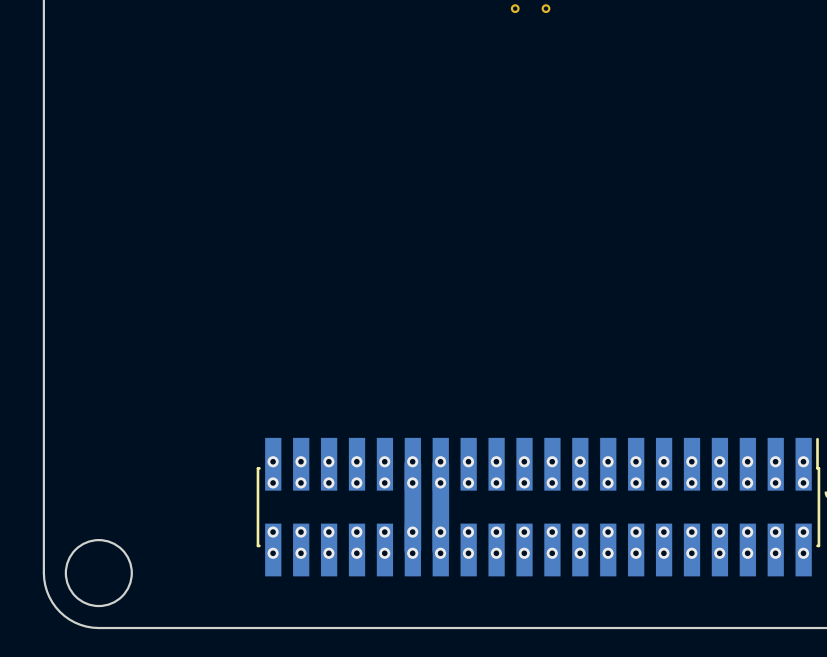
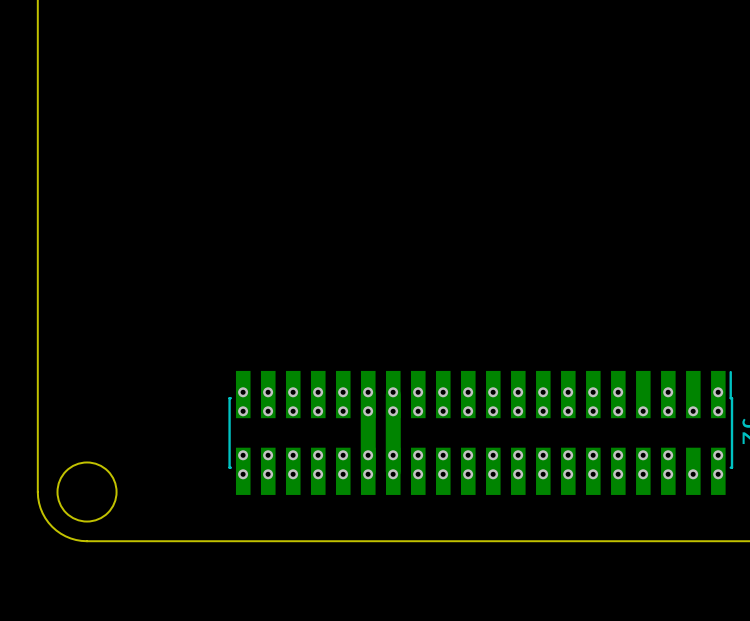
via: (719, 461) -> none
via: (775, 461) -> none
via: (775, 532) -> none

